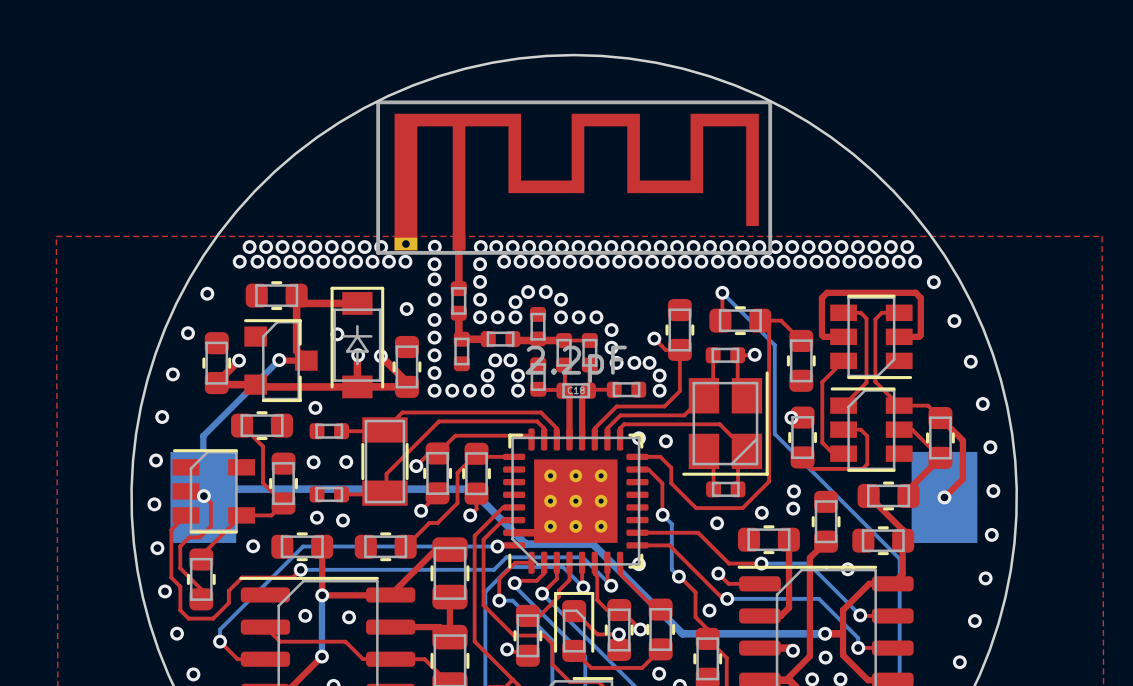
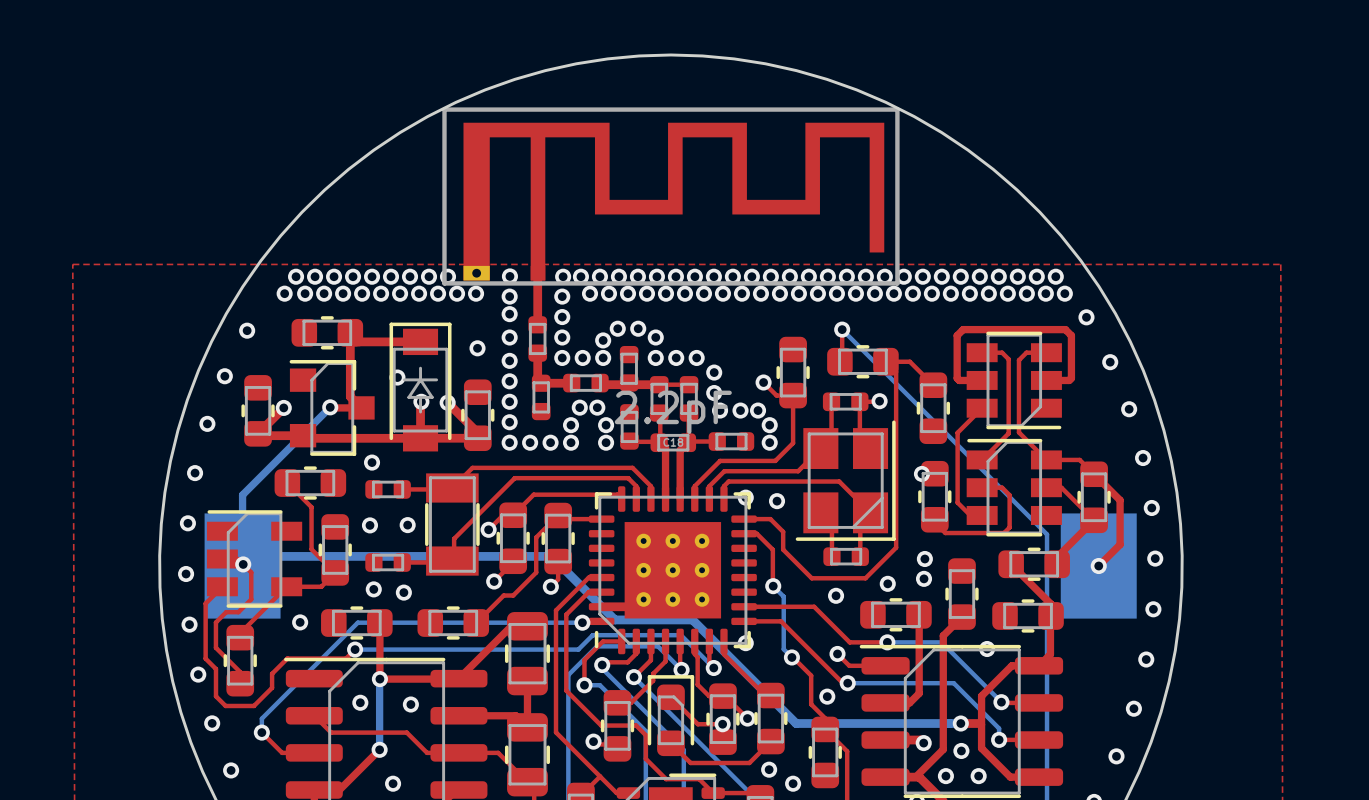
bottom track: (774, 345) (774, 433) (899, 558) -> (902, 390) (1047, 534) (1047, 637)

